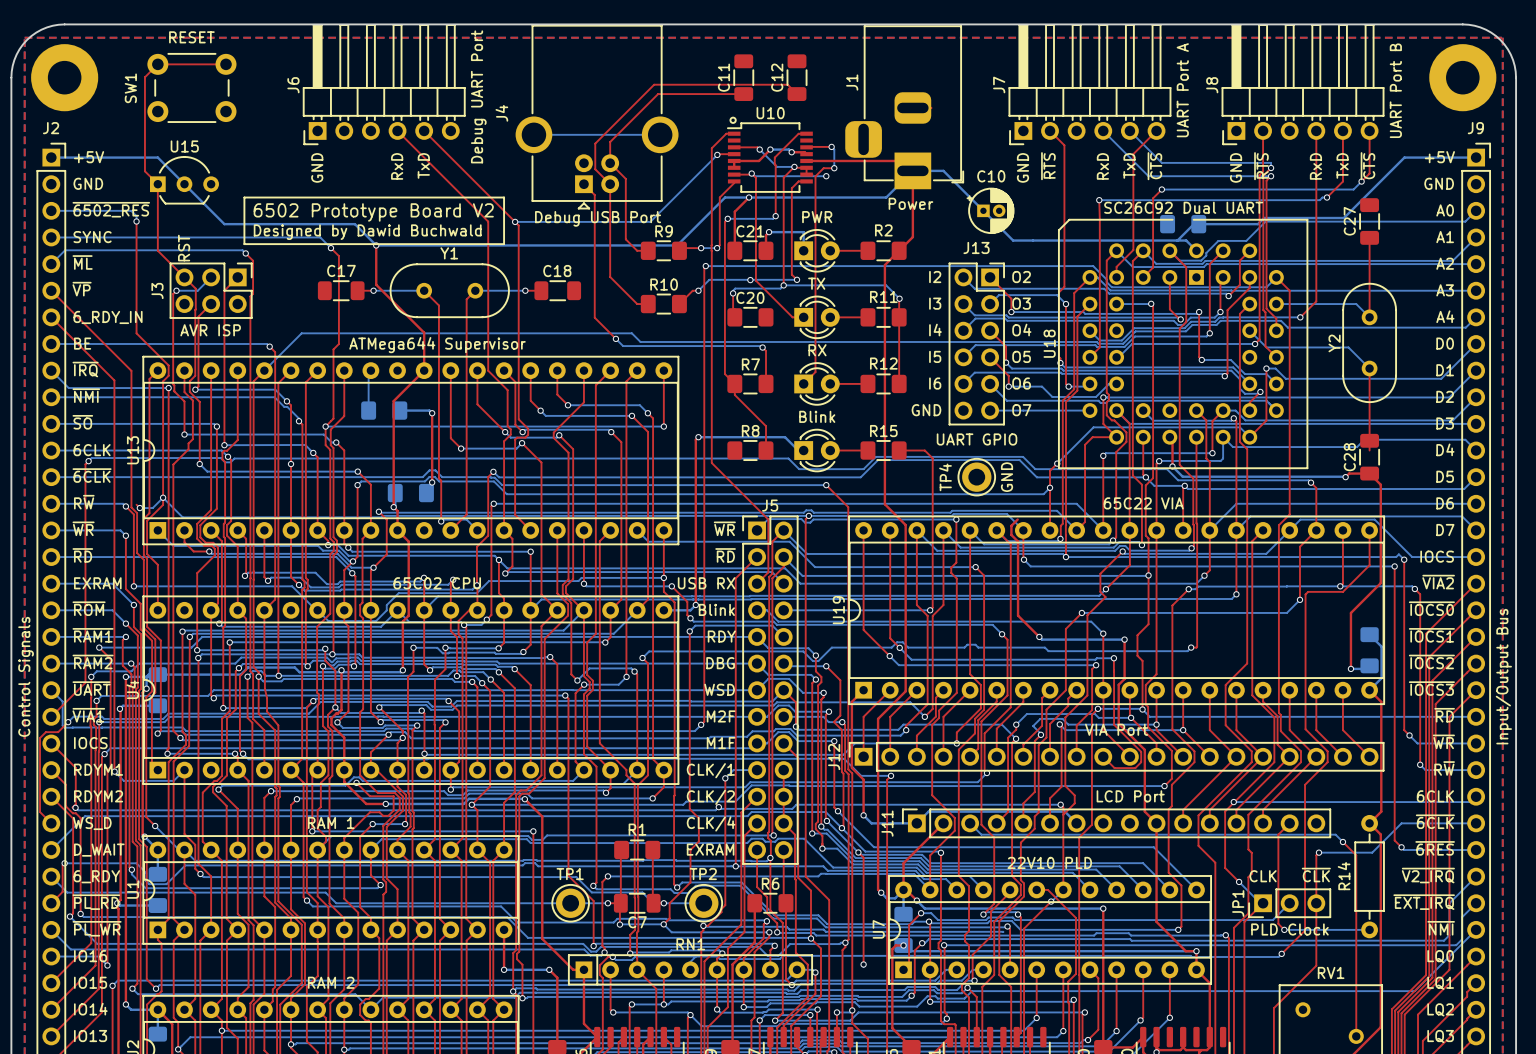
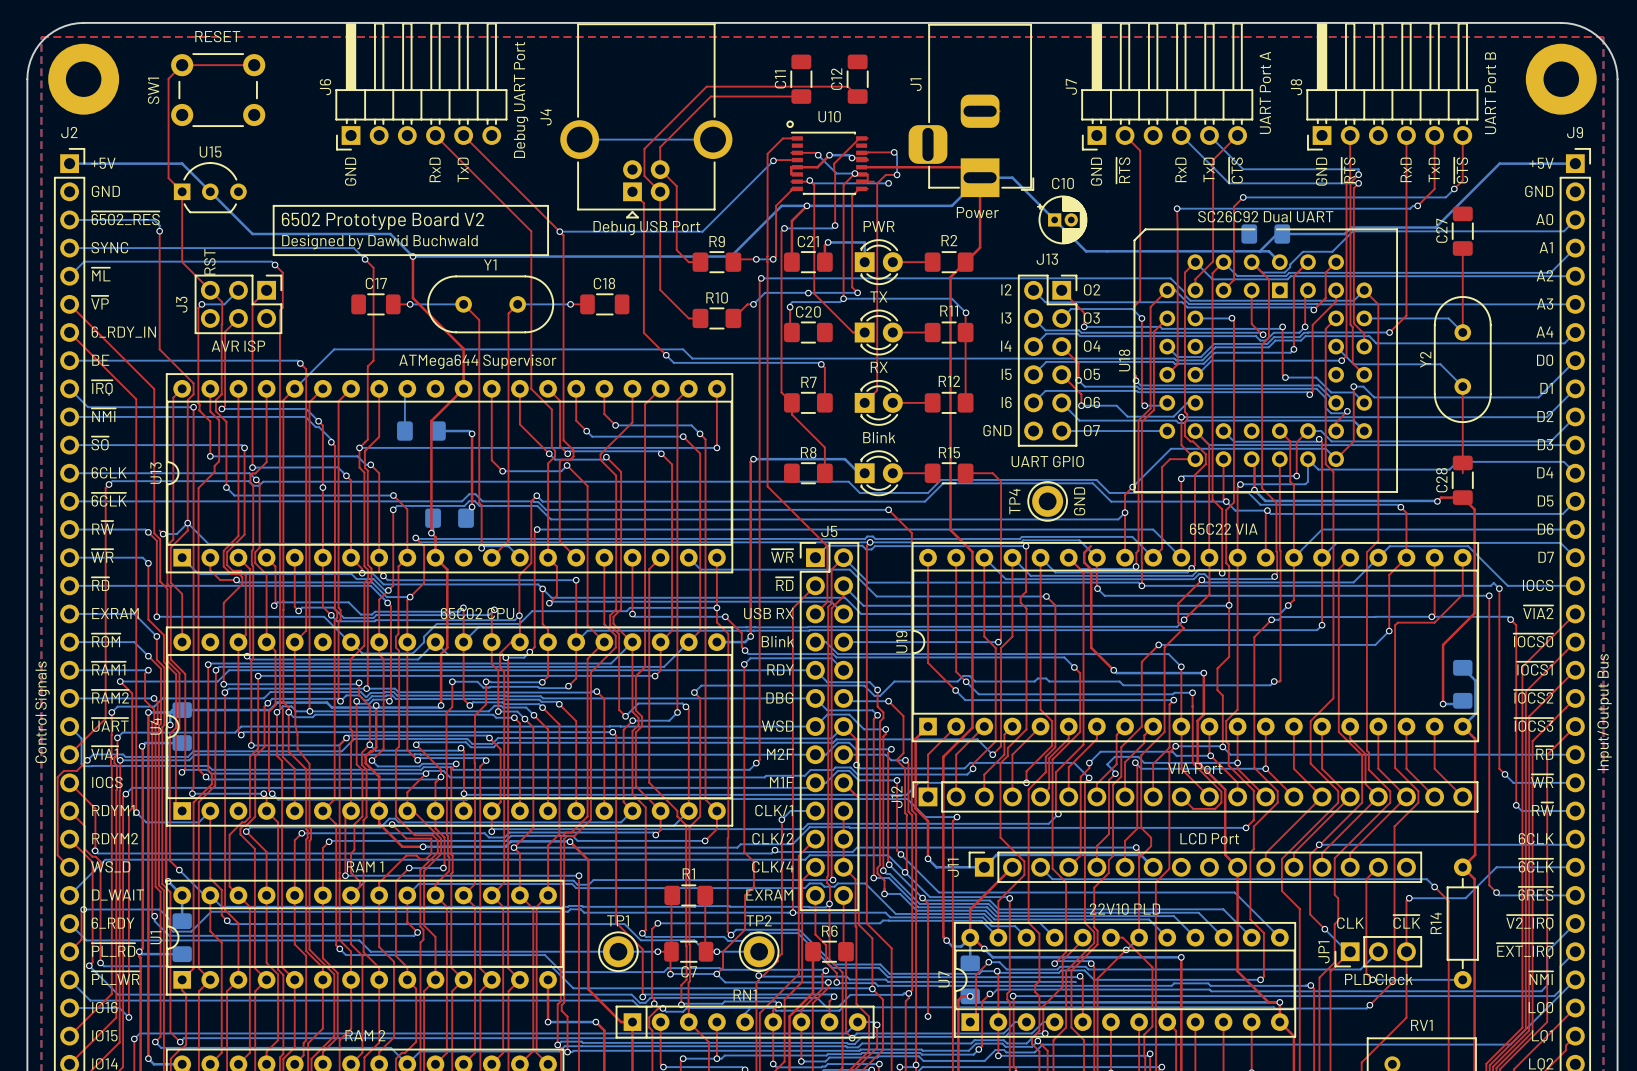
U10 footprint: [727, 122, 813, 193] -> [791, 131, 868, 195]

